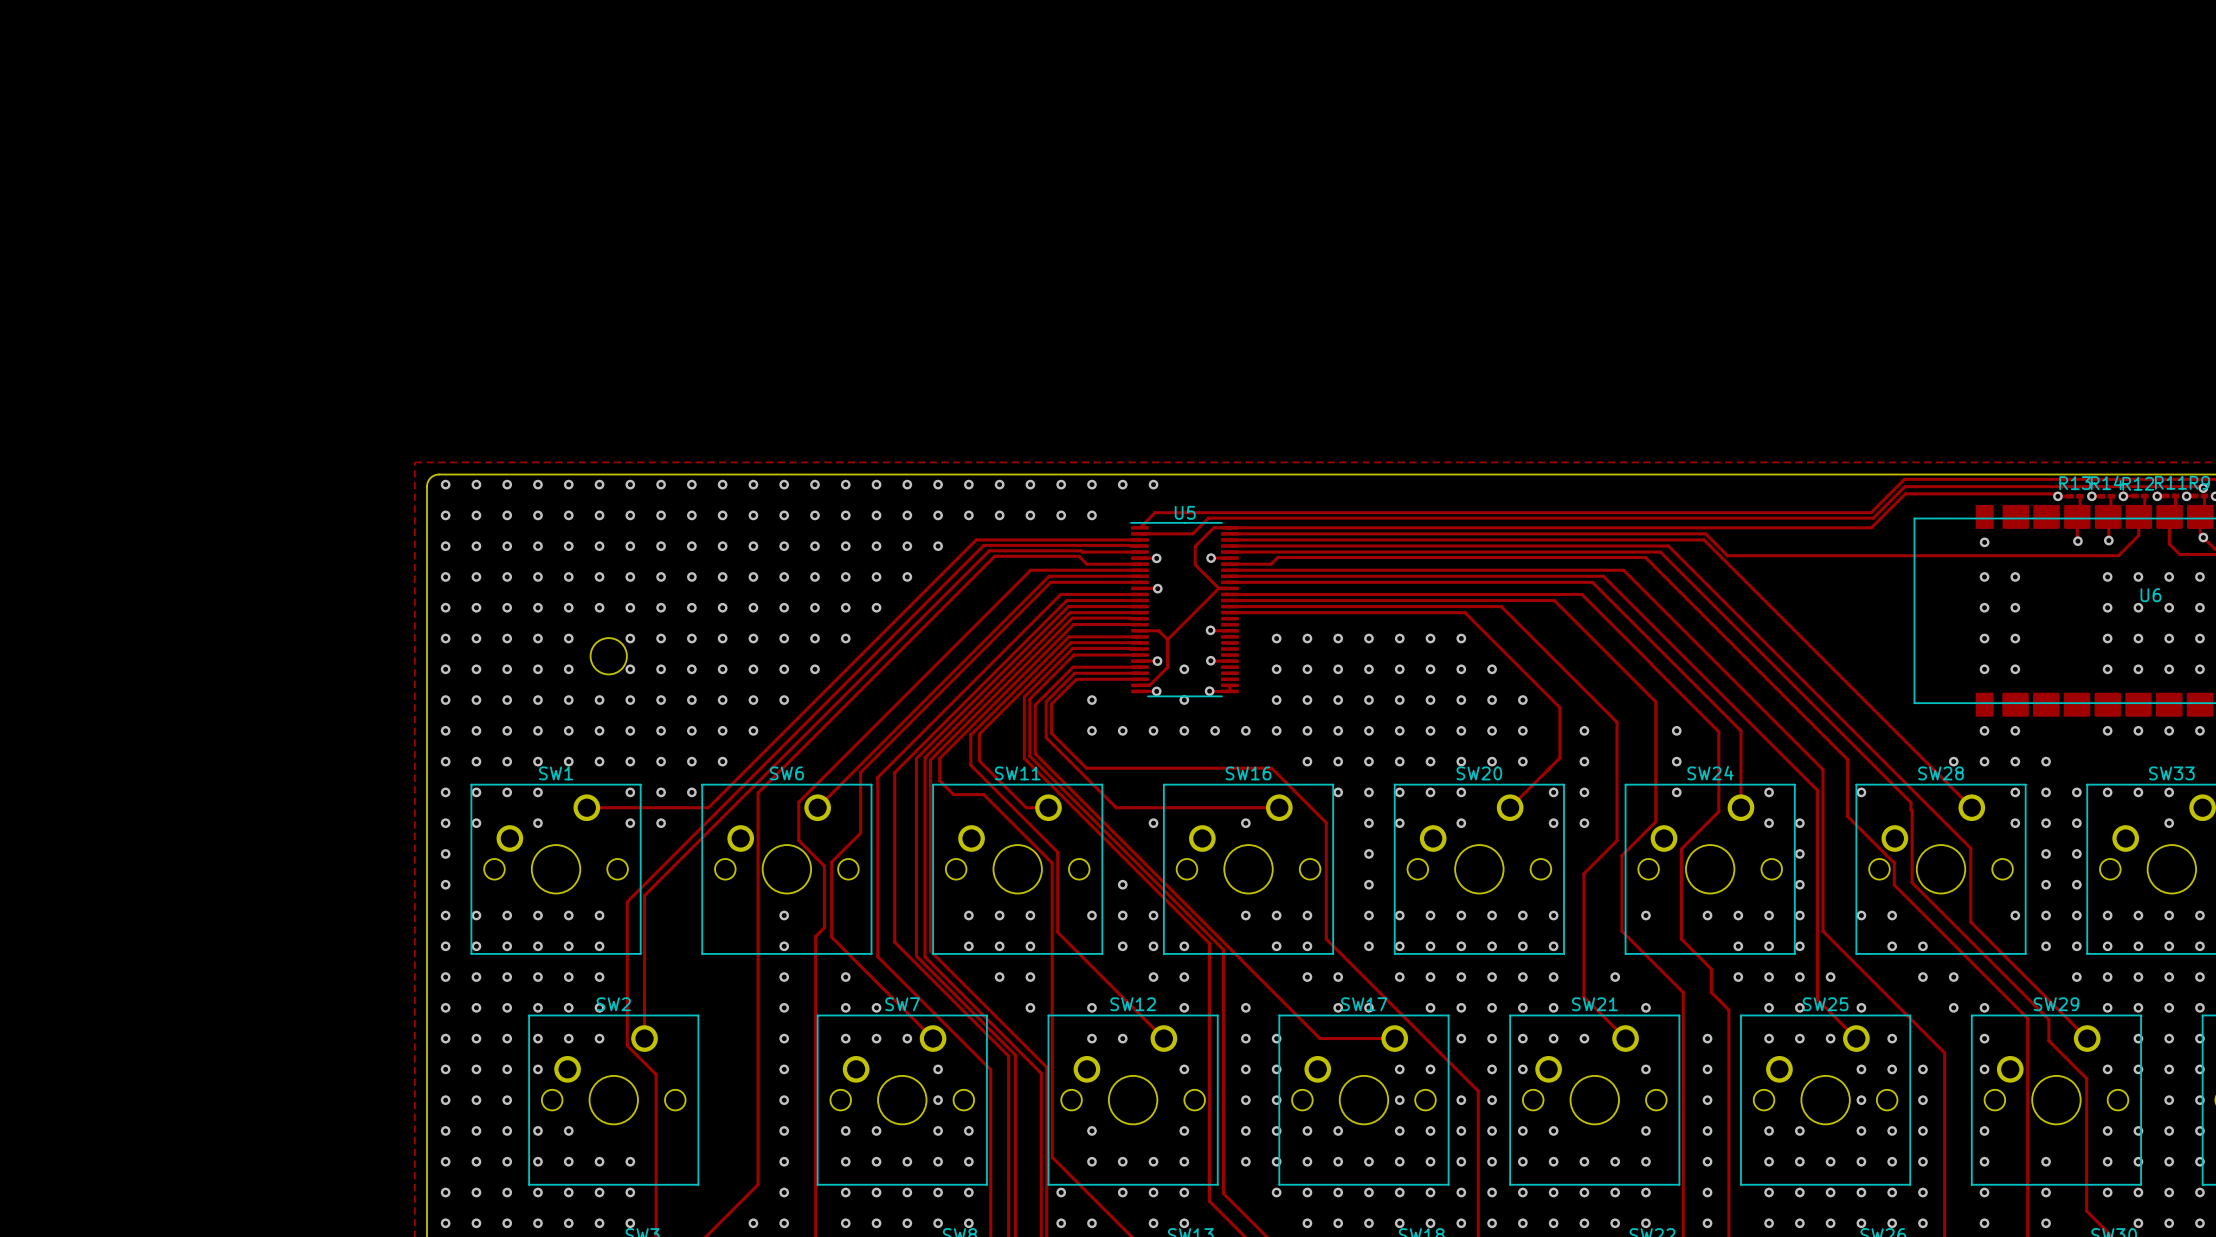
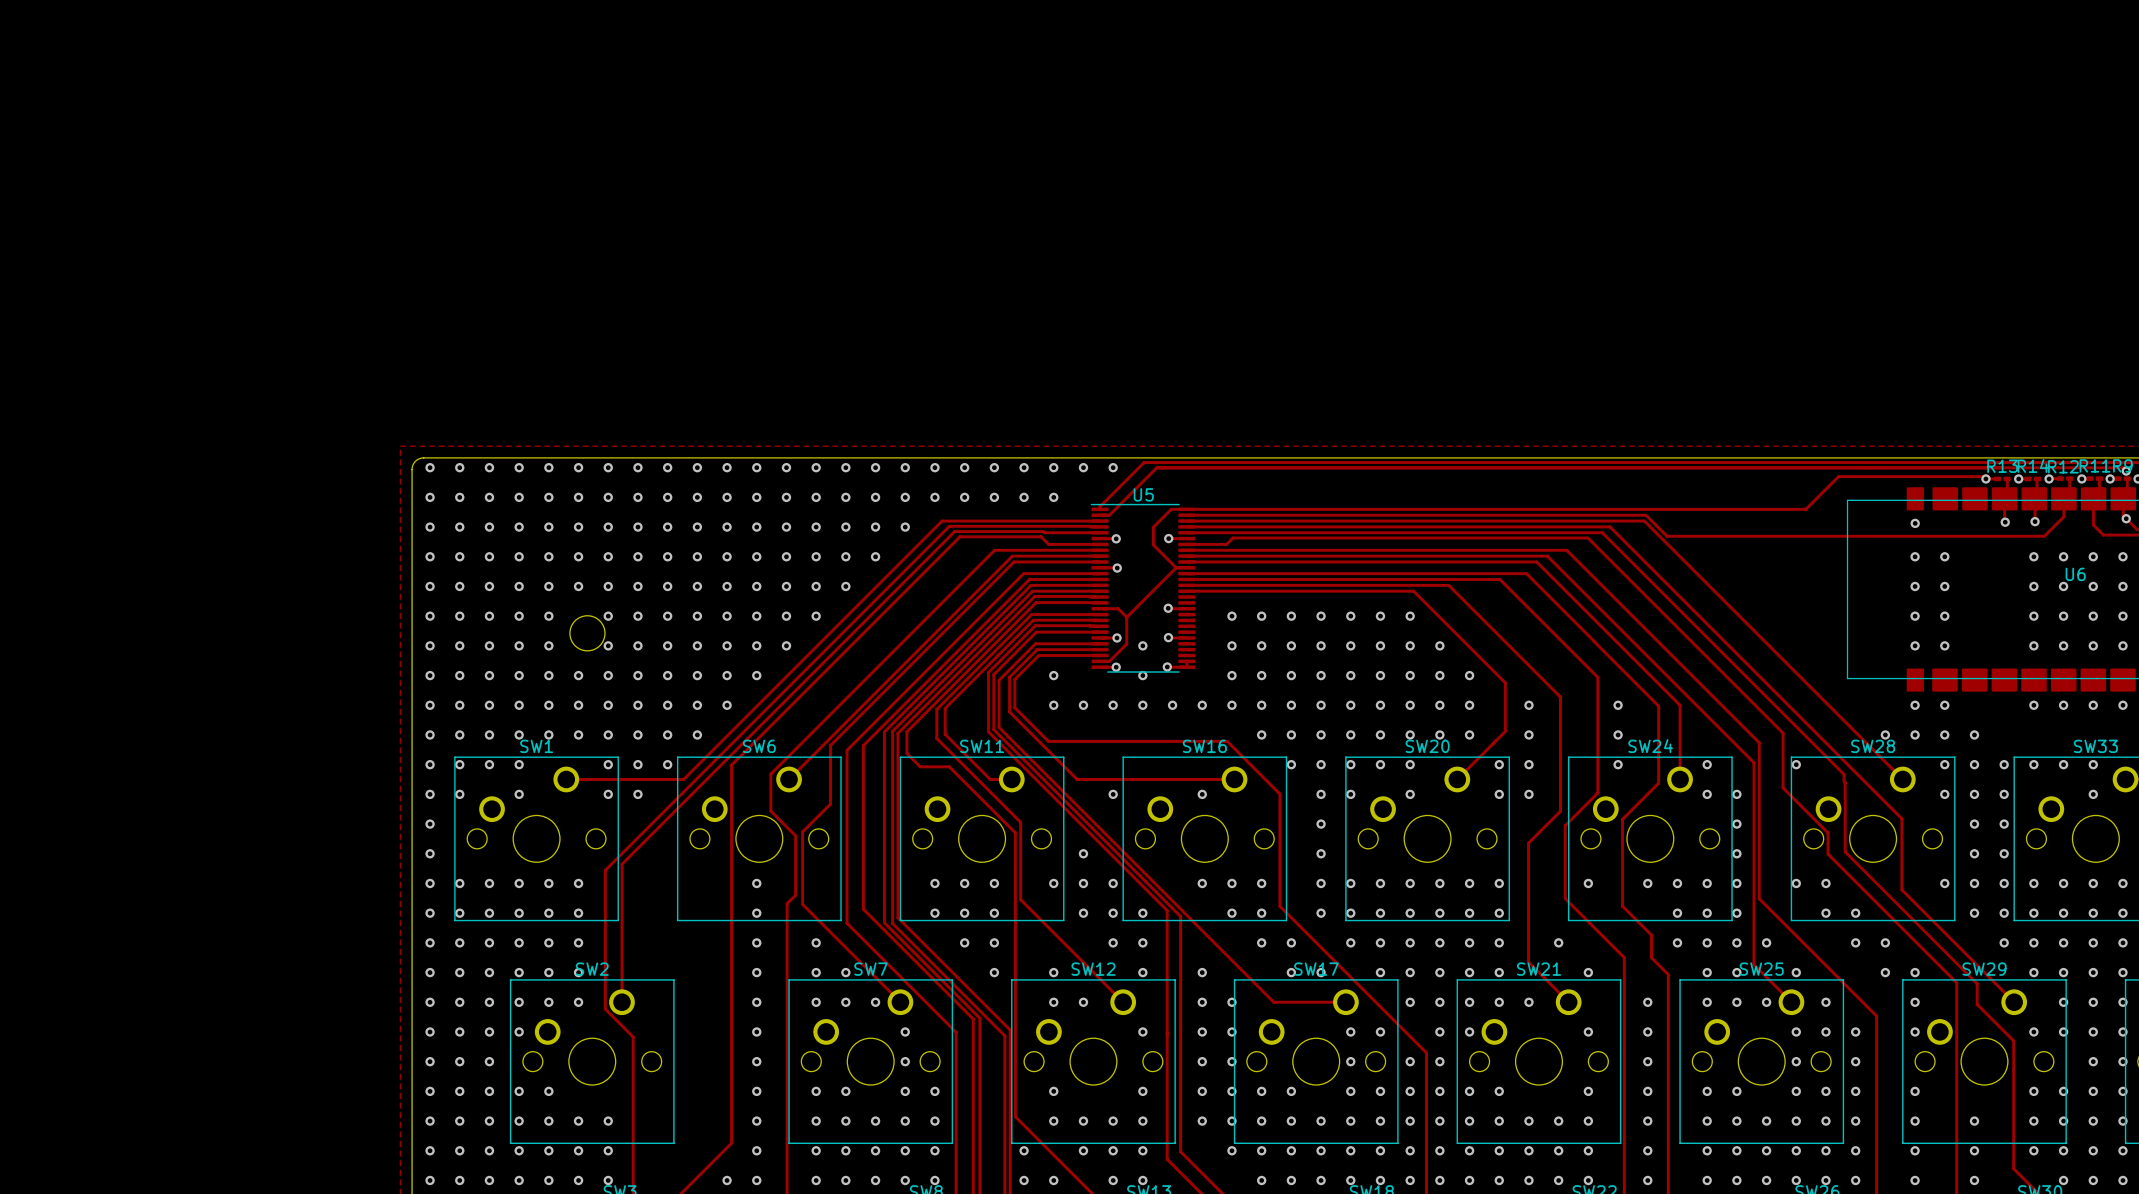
track: (1904, 479) (1871, 512) (1155, 512) (1139, 527) -> (1837, 462) (1144, 462) (1100, 506) (1100, 509)
track: (2201, 486) (1904, 486) (1873, 518) (1208, 518) (1192, 533) (1149, 533) -> (2124, 469) (2123, 467) (1156, 467) (1109, 515)

